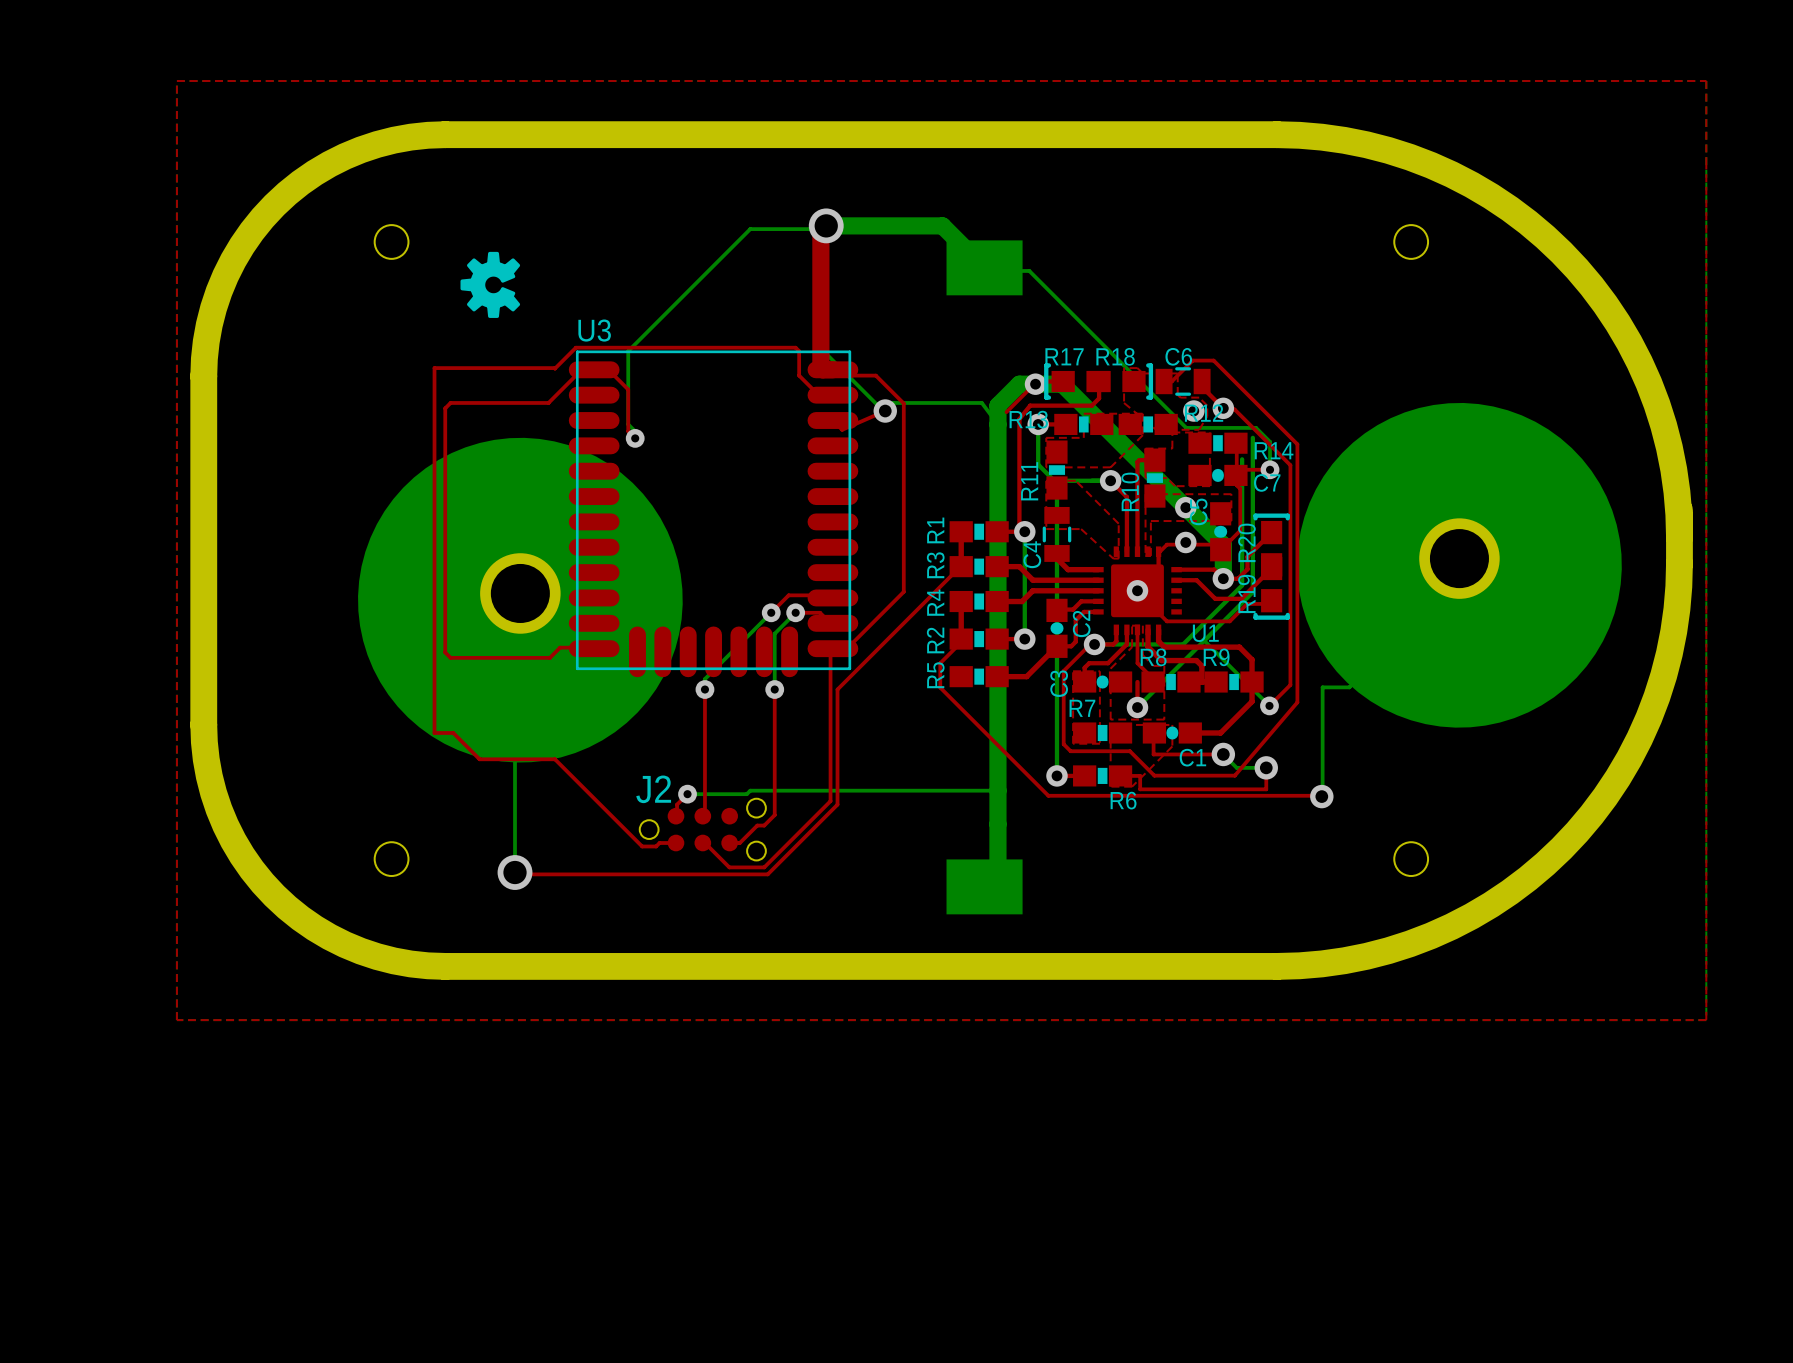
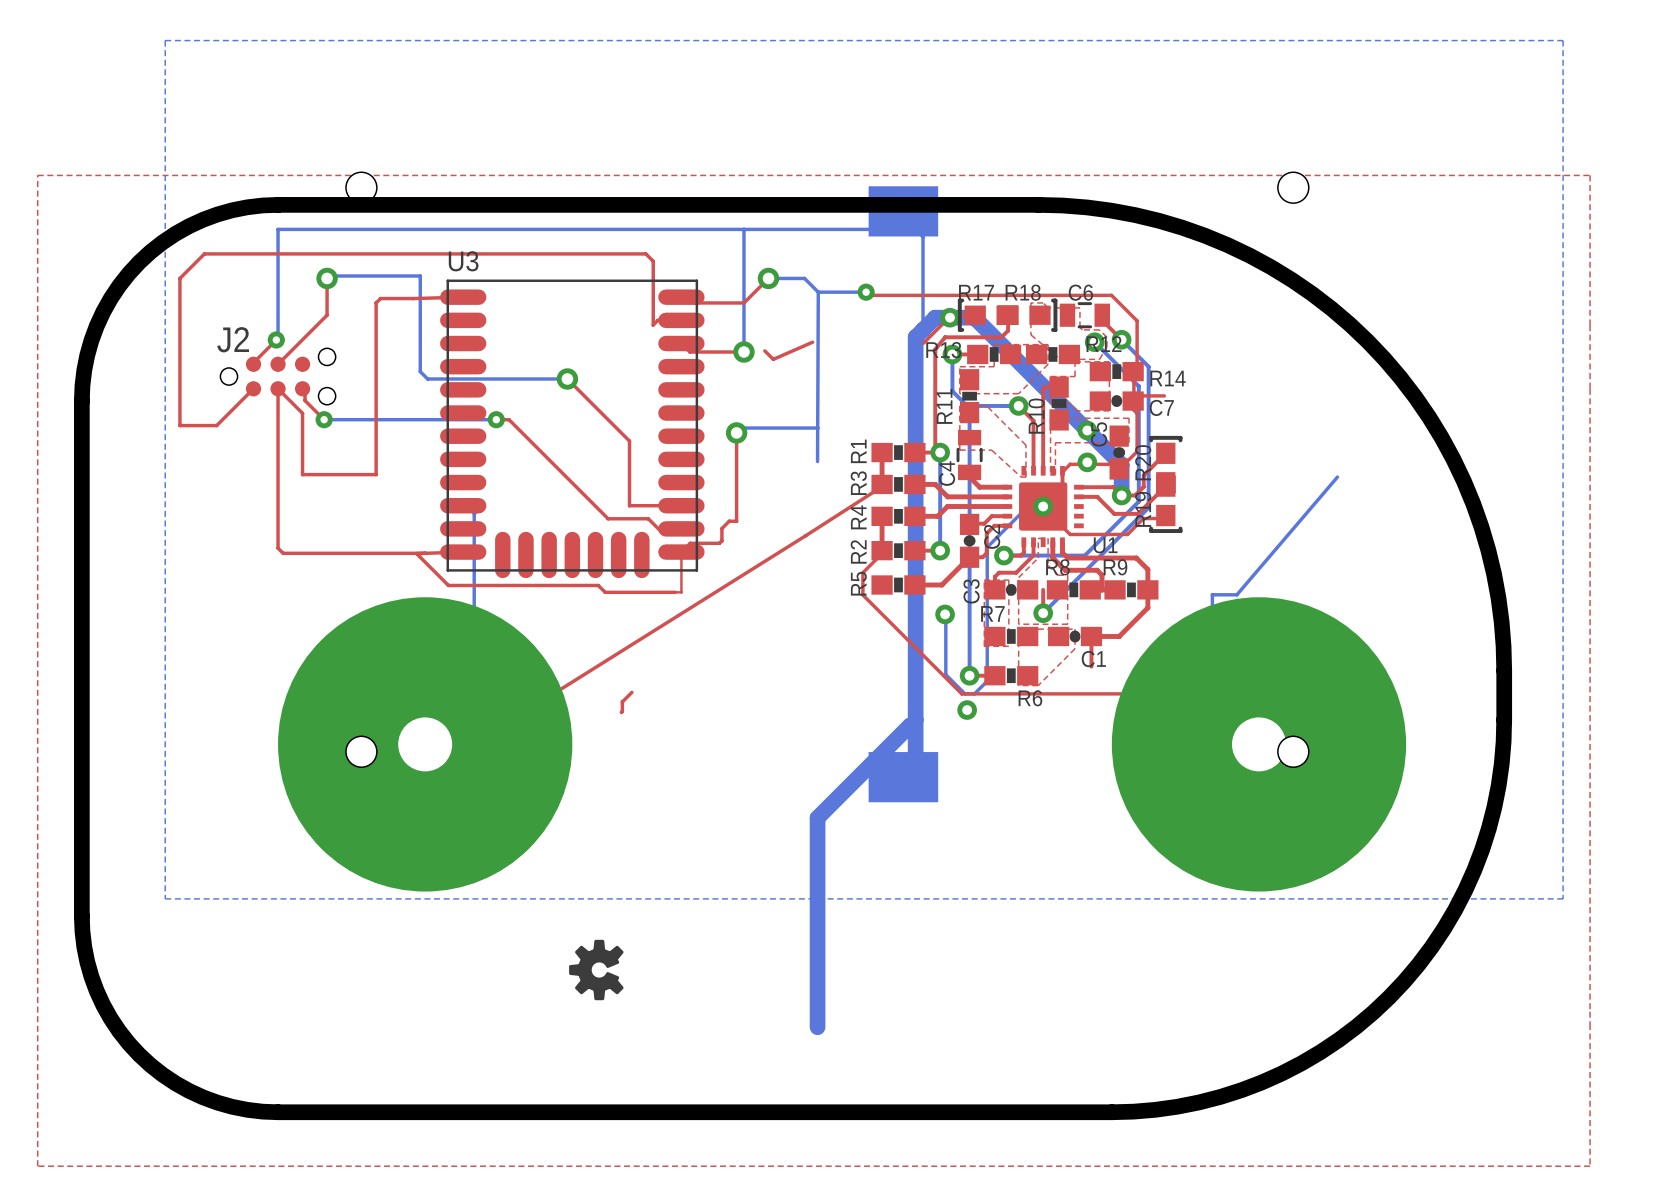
top zone outline: (176, 81) (1706, 81) (1706, 1020) (176, 1020) (176, 81) -> (37, 175) (37, 1166) (1590, 1166) (1590, 175) (37, 175)
top track: (826, 225) (820, 231) (820, 368) (832, 369) (841, 375) (875, 375) (903, 403) (903, 591) (847, 647) (834, 647) (830, 651) (830, 801) (764, 867) (729, 867) (702, 843) -> none
via: (826, 225) -> none
drawing: [460, 251, 521, 318] -> none
board edge: none -> (278, 204) (1062, 205) (1135, 215) (1182, 227) (1227, 245) (1292, 280) (1331, 308) (1367, 341) (1415, 396) (1441, 437) (1463, 481) (1481, 526) (1494, 573) (1503, 646) (1504, 719) (1501, 763) (1494, 807) (1482, 849) (1465, 890) (1444, 928) (1418, 964) (1389, 997) (1356, 1026) (1320, 1052) (1282, 1073) (1241, 1090) (1199, 1102) (1155, 1109) (1111, 1112) (278, 1112) (232, 1106) (202, 1097) (175, 1083) (139, 1054) (119, 1031) (96, 991) (84, 946) (81, 916) (82, 385) (87, 355) (96, 325) (119, 285) (139, 262) (162, 242) (202, 219) (232, 210) (278, 204)
bottom track: none -> (743, 229) (743, 352)
top track: none -> (327, 278) (327, 315) (278, 364)
bottom track: none -> (327, 278) (329, 275) (420, 275) (420, 371) (427, 378) (567, 378)
via: none -> (327, 278)
top track: none -> (768, 278) (743, 302) (694, 302) (689, 297) (681, 297)
bottom track: none -> (768, 278) (804, 278) (818, 292)
via: none -> (768, 278)
bottom track: (820, 347) (882, 410) (885, 411) (893, 402) (981, 402) (997, 424) -> none
bottom track: none -> (818, 292) (866, 292)
bottom track: none -> (818, 292) (817, 461)
top track: none -> (866, 292) (866, 295) (1111, 295) (1137, 320) (1137, 365) (1133, 371)
via: none -> (866, 292)
top track: none -> (463, 297) (380, 298) (376, 302) (376, 474) (302, 474) (302, 413) (278, 388) (278, 548) (283, 553) (425, 553)
top track: (1164, 381) (1171, 381) (1192, 360) (1213, 360) (1297, 444) (1297, 702) (1234, 775) (1154, 775) (1129, 751) (1070, 751) (1063, 744) (1063, 671) (1091, 643) (1094, 644) -> none
top track: none -> (681, 320) (657, 320) (653, 325) (653, 261) (645, 253) (204, 253) (179, 278) (179, 425) (216, 425) (253, 388)
top track: (832, 395) (830, 393) (816, 393) (799, 375) (799, 351) (795, 347) (575, 347) (554, 368) (434, 368) (434, 732) (453, 732) (479, 759) (554, 759) (642, 846) (656, 846) (659, 843) (675, 843) -> none
bottom track: none -> (923, 329) (923, 236) (915, 229) (278, 229) (278, 338) (276, 340)
top track: none -> (276, 340) (253, 364)
via: none -> (276, 340)
top track: (1223, 408) (1234, 409) (1290, 465) (1290, 684) (1269, 705) -> none
bottom track: none -> (1121, 339) (1148, 366)
via: (885, 411) -> none
bottom track: none -> (1094, 342) (1138, 386)
top track: none -> (681, 343) (689, 352) (743, 352)
via: none -> (743, 352)
top track: (635, 438) (628, 431) (628, 389) (610, 372) (596, 372) (594, 369) (593, 372) (579, 372) (548, 402) (450, 402) (445, 408) (445, 652) (450, 657) (549, 657) (560, 647) (594, 648) -> none
bottom track: (635, 438) (635, 431) (628, 424) (628, 351) (750, 229) (820, 229) (826, 225) (942, 225) (984, 267) (990, 270) (1029, 270) (1186, 427) (1256, 427) (1270, 441) (1270, 469) -> none
via position: (635, 438) -> (496, 419)
top track: none -> (567, 378) (629, 441) (629, 505) (681, 505)
via: none -> (567, 378)
top track: none -> (302, 388) (305, 391) (305, 400) (324, 419)
via: (1270, 469) -> none
bottom track: none -> (324, 419) (496, 419)
via: none -> (324, 419)
top track: none -> (496, 419) (509, 419) (608, 518) (648, 518) (660, 531) (681, 528)
bottom track: none -> (817, 428) (741, 428) (736, 432)
top track: none -> (736, 432) (736, 521) (729, 521) (721, 528) (721, 540) (719, 543) (690, 543) (681, 552) (681, 592) (605, 592) (598, 585) (448, 585) (416, 553) (463, 552)
via: none -> (736, 432)
board edge: (1679, 510) (1679, 563) (1676, 609) (1663, 675) (1639, 738) (1605, 796) (1561, 848) (1527, 878) (1491, 904) (1451, 926) (1409, 943) (1344, 960) (1277, 966) (445, 966) (410, 963) (377, 956) (329, 936) (300, 918) (274, 895) (251, 869) (233, 840) (213, 792) (206, 759) (203, 724) (203, 376) (206, 341) (213, 308) (225, 275) (242, 245) (262, 218) (287, 193) (314, 172) (344, 156) (377, 144) (410, 137) (445, 134) (1277, 134) (1322, 137) (1388, 150) (1451, 174) (1491, 196) (1545, 237) (1591, 286) (1629, 342) (1656, 404) (1673, 469) (1676, 492) (1678, 514) (1679, 537) -> none
U3 position: (713, 513) -> (572, 428)
part: (1459, 565) -> none
top track: (961, 566) (837, 689) (837, 804) (767, 874) (516, 874) (515, 872) -> (882, 484) (882, 486) (805, 535) (477, 741) (426, 741) (425, 744)
bottom track: none -> (1043, 506) (1041, 508) (1025, 508) (987, 547) (987, 681) (974, 693) (964, 693) (945, 674) (945, 614)
top track: (832, 597) (830, 595) (788, 595) (771, 612) -> none
part: (520, 600) -> none
bottom track: (771, 612) (704, 679) (704, 689) -> none
via: (771, 612) -> none
top track: (795, 612) (820, 612) (832, 623) -> none
bottom track: (795, 612) (774, 633) (774, 689) -> none
via: (795, 612) -> none
top track: (1137, 629) (1137, 663) (1153, 678) (1153, 682) -> none
bottom track: (1203, 639) (1269, 705) -> none
top track: (704, 689) (704, 815) (702, 816) -> none
via: (704, 689) -> none
top track: (774, 689) (774, 815) (764, 825) (757, 825) (739, 843) (729, 843) -> none
via: (774, 689) -> none
via: (1269, 705) -> none
via: none -> (945, 614)
top track: (1154, 732) (1153, 754) (1223, 754) -> none
top track: none -> (1091, 636) (1091, 666)
bottom track: (1223, 754) (1236, 767) (1266, 767) -> none
via: (1223, 754) -> none
top track: (1266, 767) (1266, 789) (1140, 789) (1140, 775) (1120, 775) -> none
via: (1266, 767) -> none
bottom track: (997, 790) (750, 790) (746, 794) (687, 794) -> none
via: (687, 794) -> none
via: (1321, 796) -> none
via: none -> (967, 710)
J2 position: (702, 829) -> (278, 376)
bottom track: none -> (910, 725) (817, 817) (817, 1027)
part: none -> (425, 744)
part: none -> (1258, 744)
via: (515, 872) -> none
drawing: none -> [569, 939, 624, 1001]

